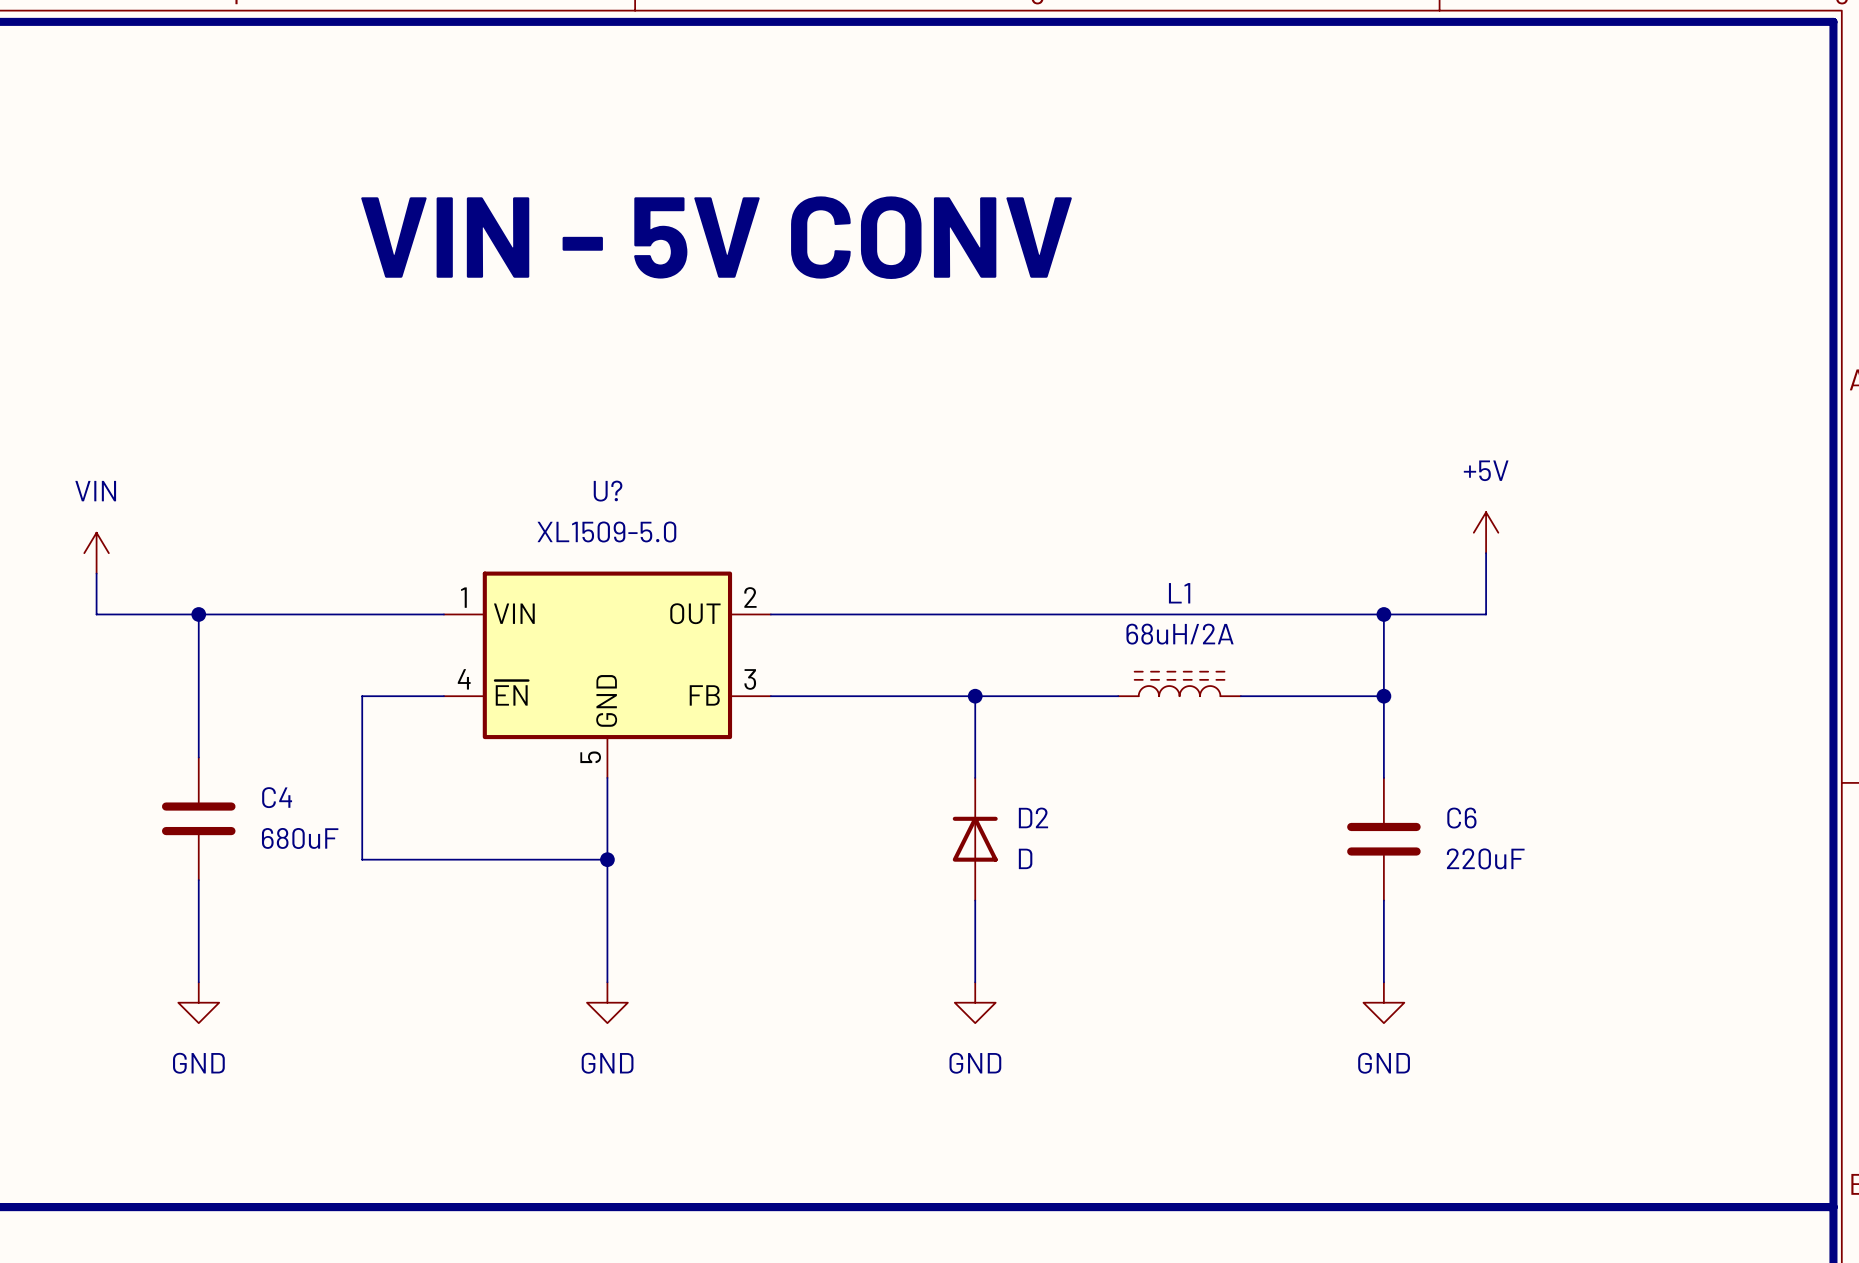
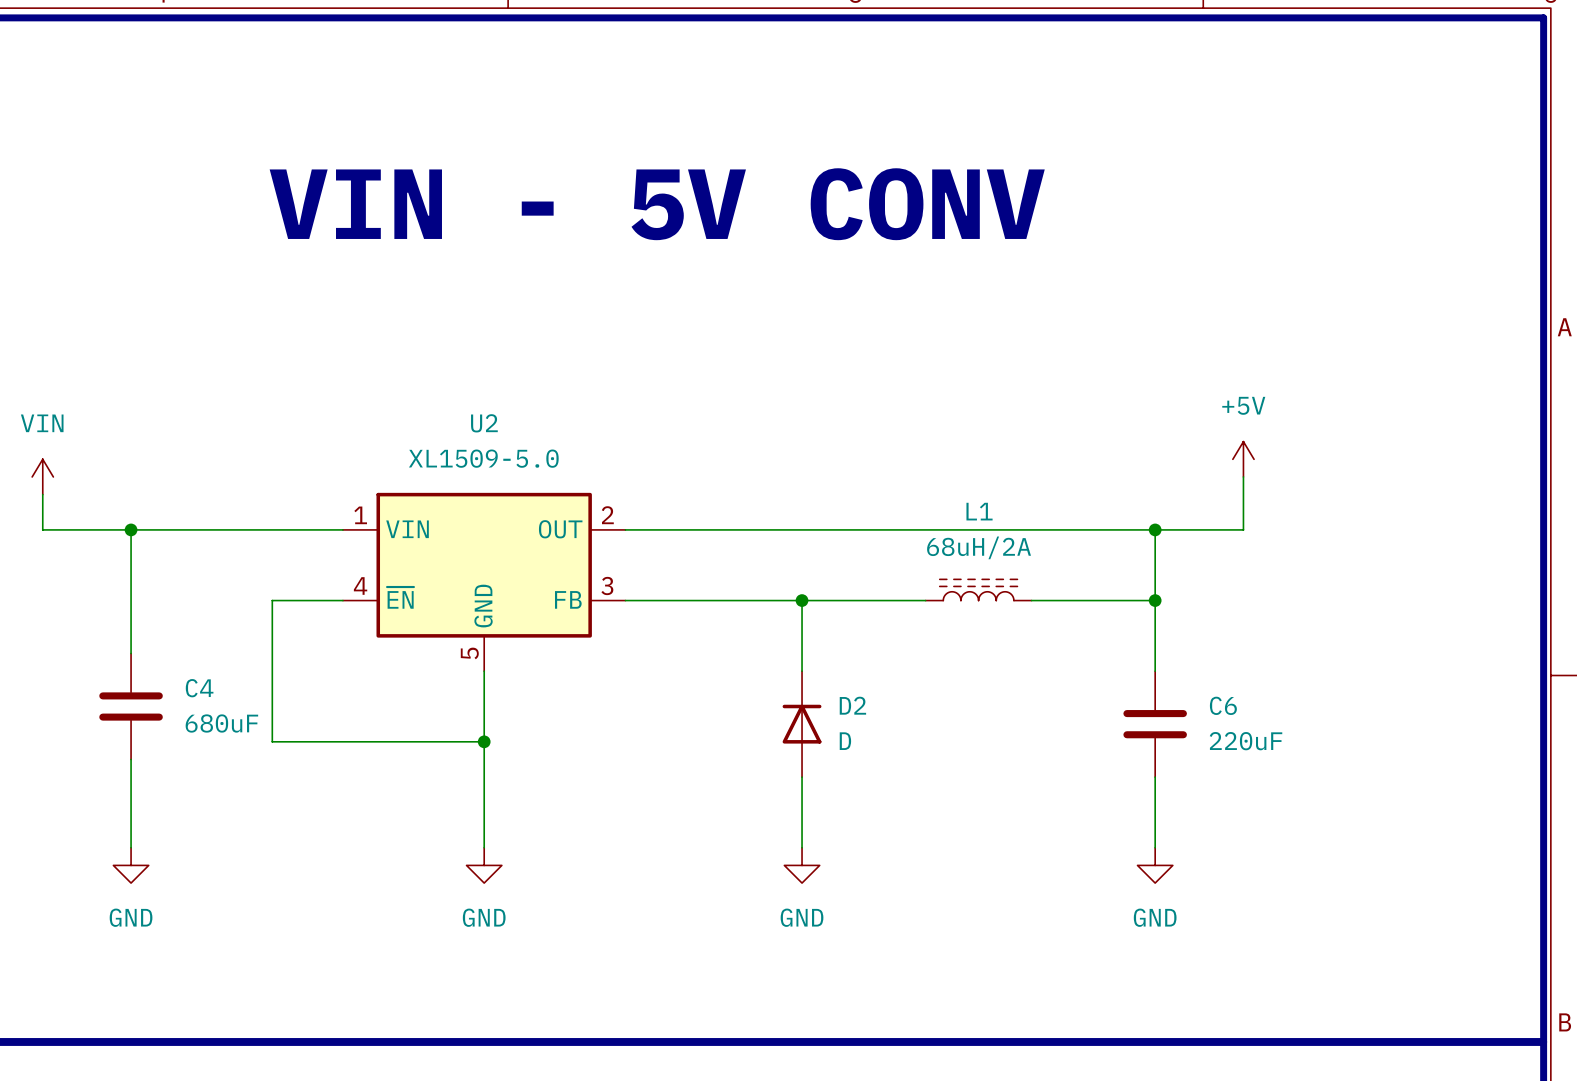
U? name: U? (608, 491) -> U2 (484, 423)

